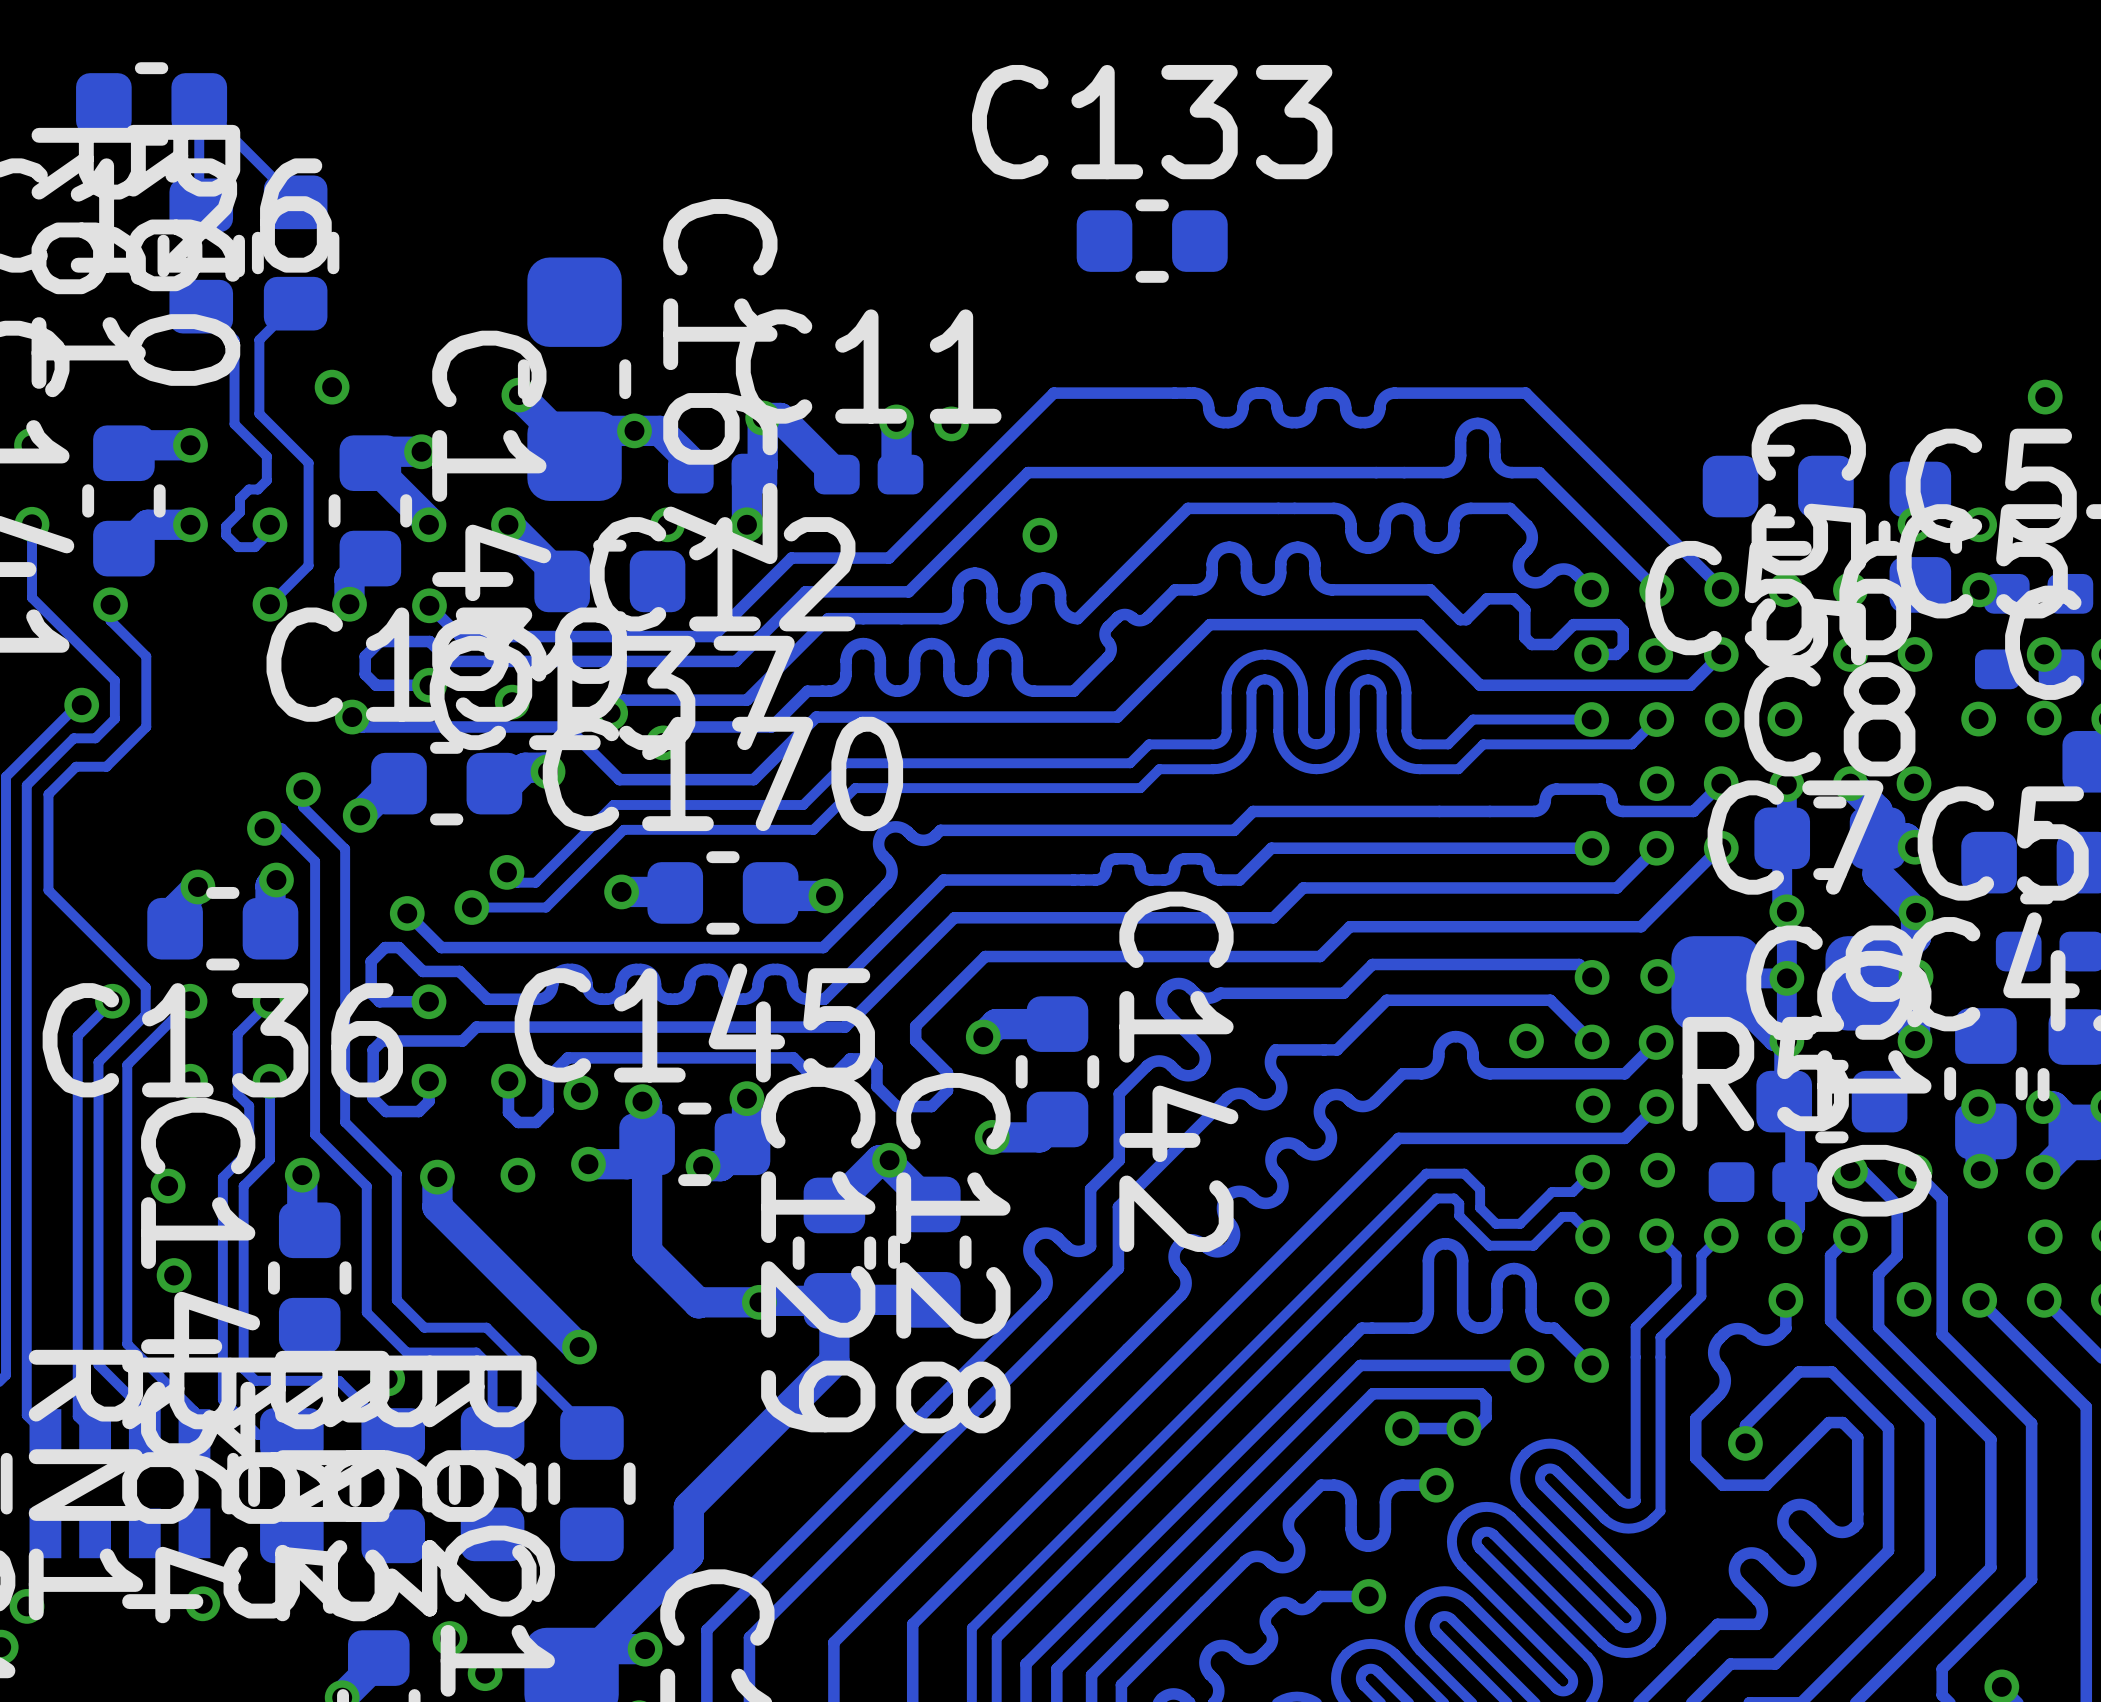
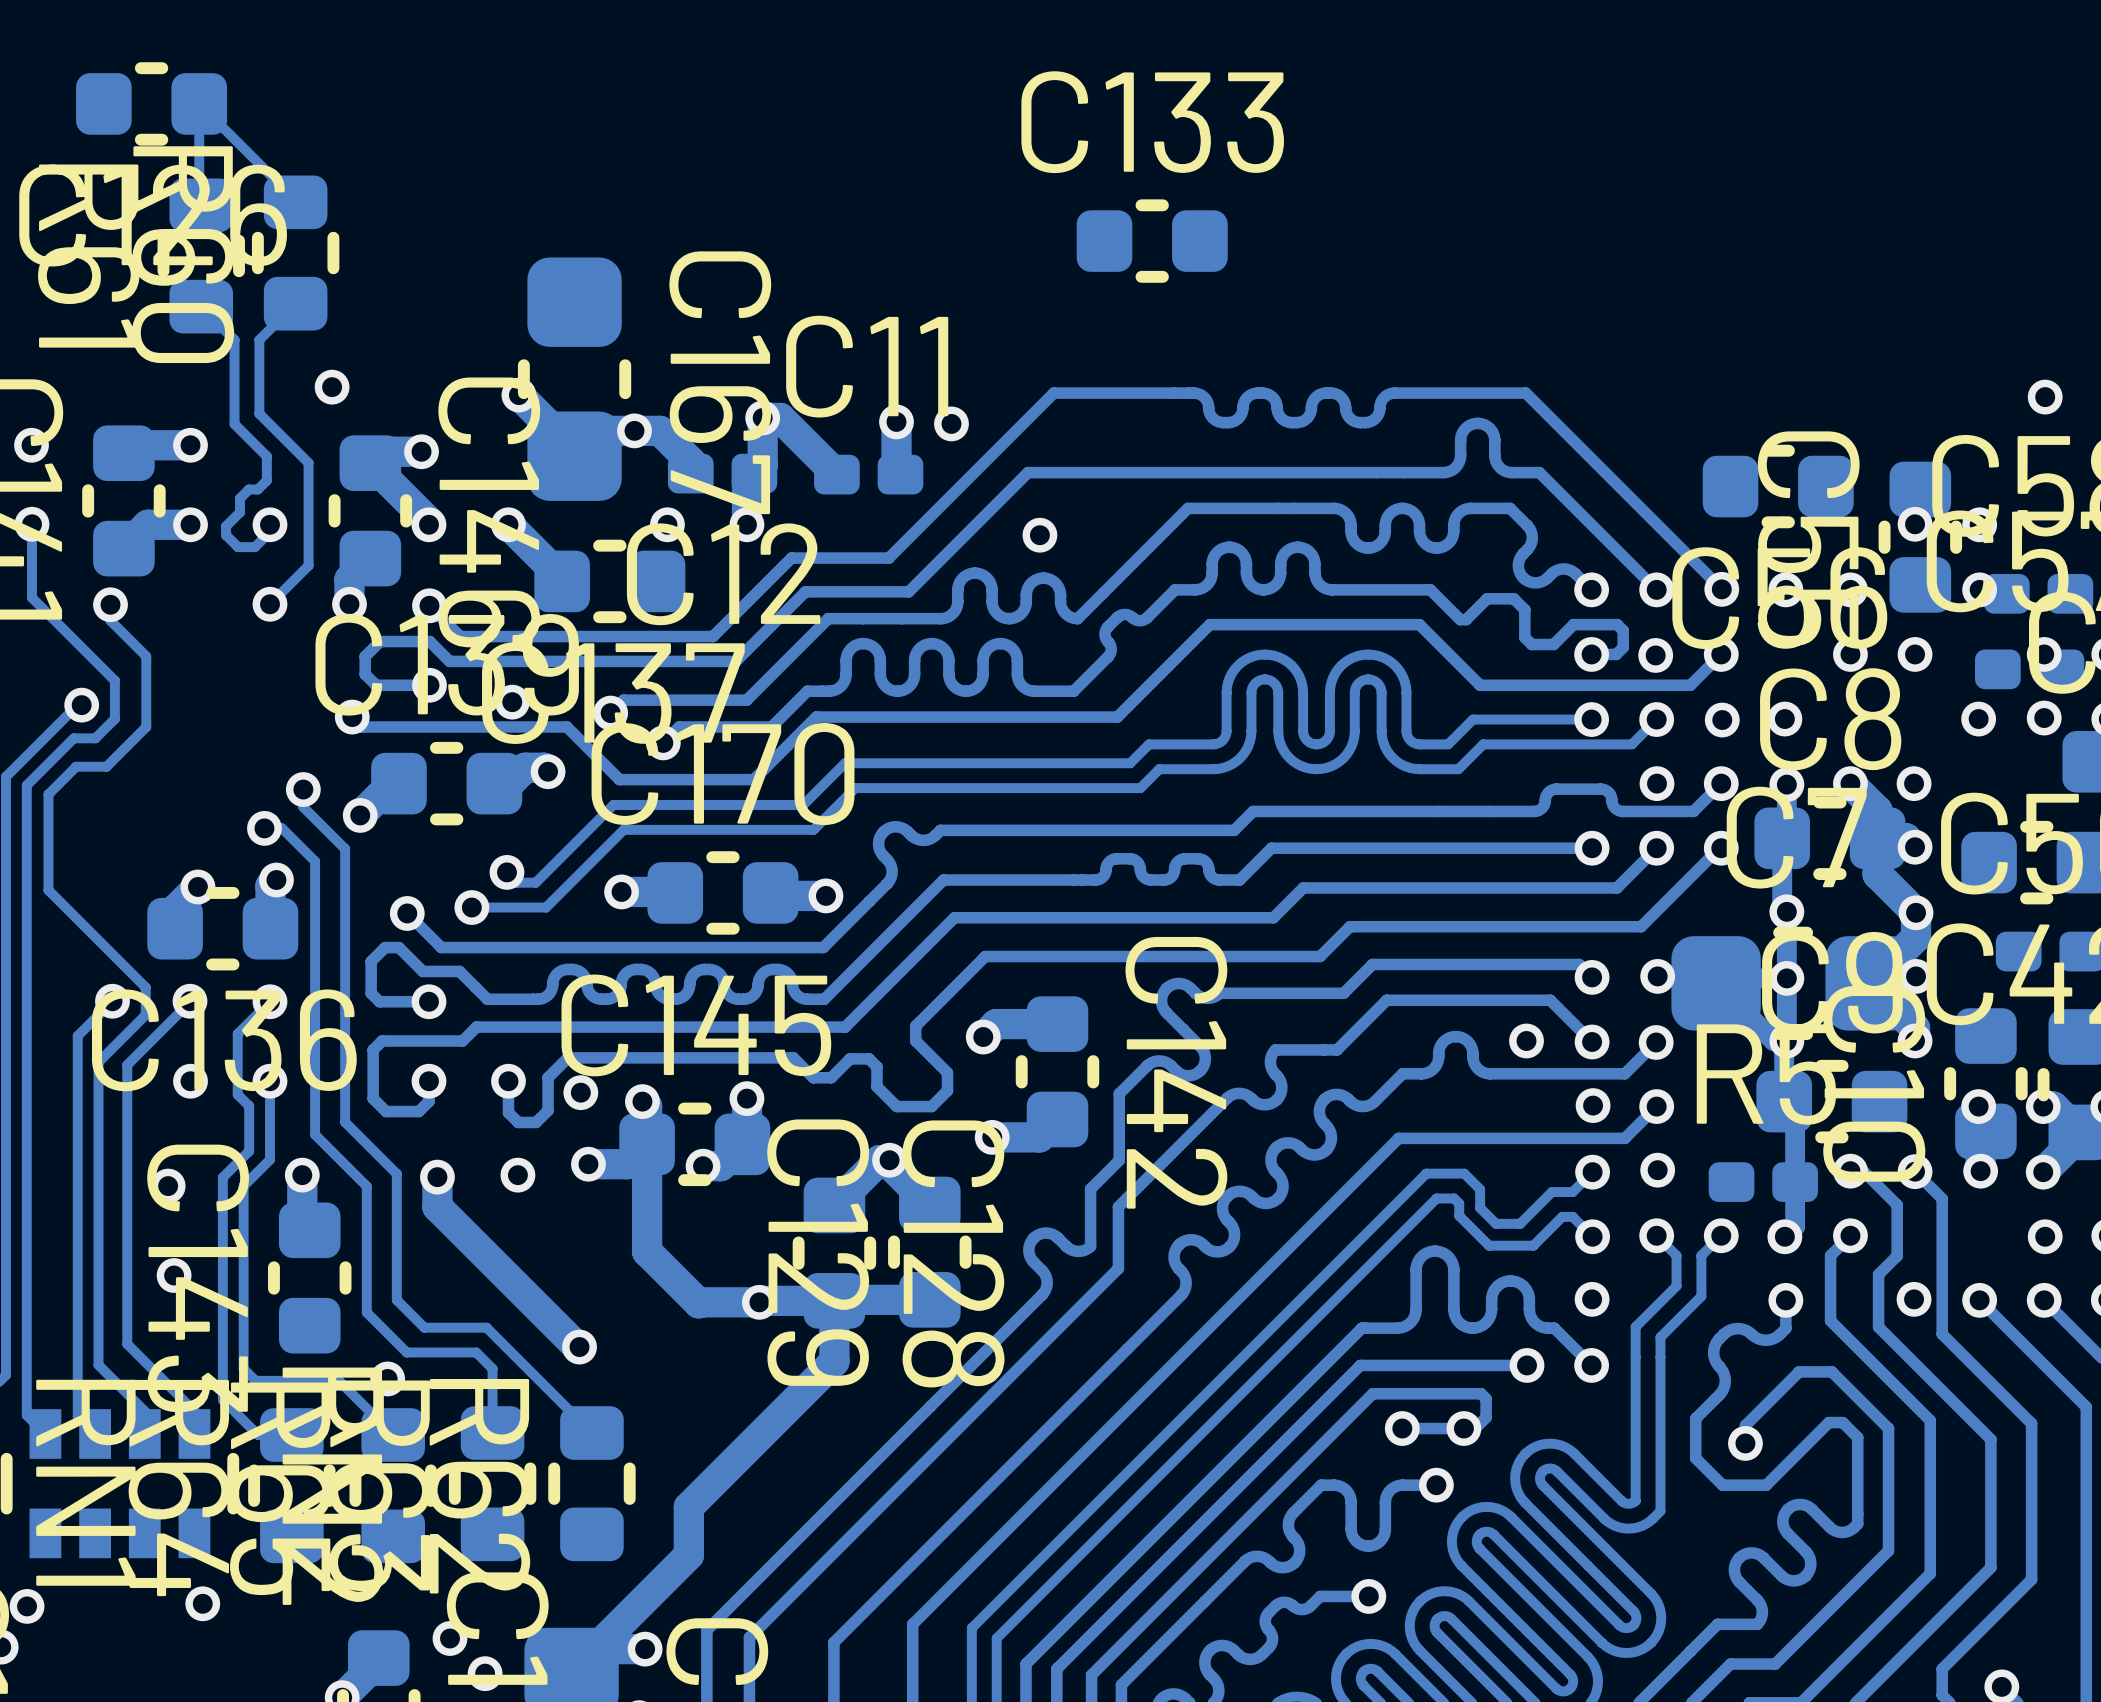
track: (1548, 1328) (1539, 1325) (1533, 1319) (1531, 1313) (1529, 1279) (1522, 1270) (1514, 1268) (1505, 1270) (1498, 1279) (1496, 1313) (1493, 1321) (1482, 1328) (1469, 1324) (1462, 1313) (1462, 1256) (1455, 1247) (1445, 1243) (1435, 1247) (1428, 1256) (1428, 1311) (1426, 1319) (1415, 1327) (1397, 1328) -> (1548, 1328) (1538, 1325) (1531, 1318) (1528, 1294) (1525, 1288) (1519, 1283) (1510, 1280) (1501, 1283) (1494, 1290) (1490, 1314) (1486, 1322) (1472, 1328) (1461, 1324) (1454, 1311) (1452, 1262) (1444, 1253) (1434, 1251) (1423, 1255) (1416, 1265) (1414, 1316) (1406, 1325) (1397, 1328)

